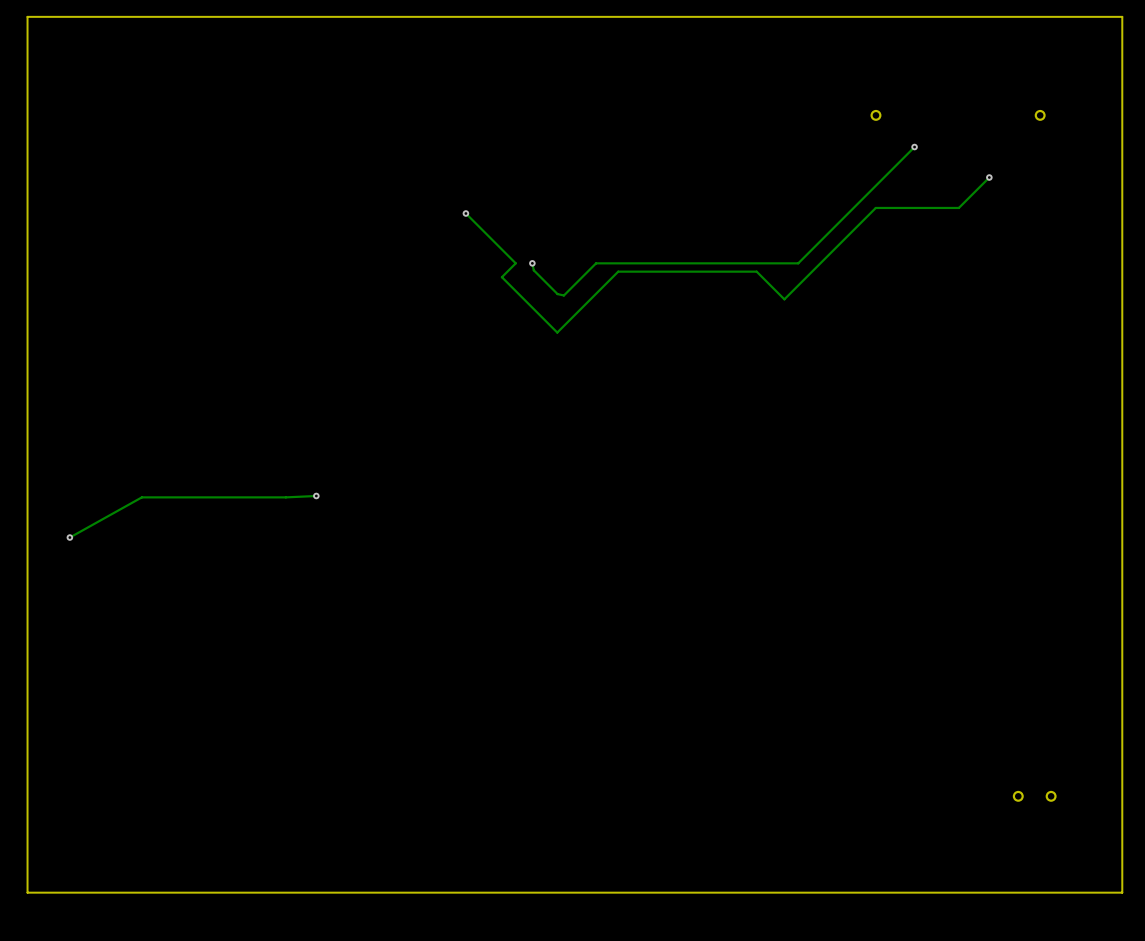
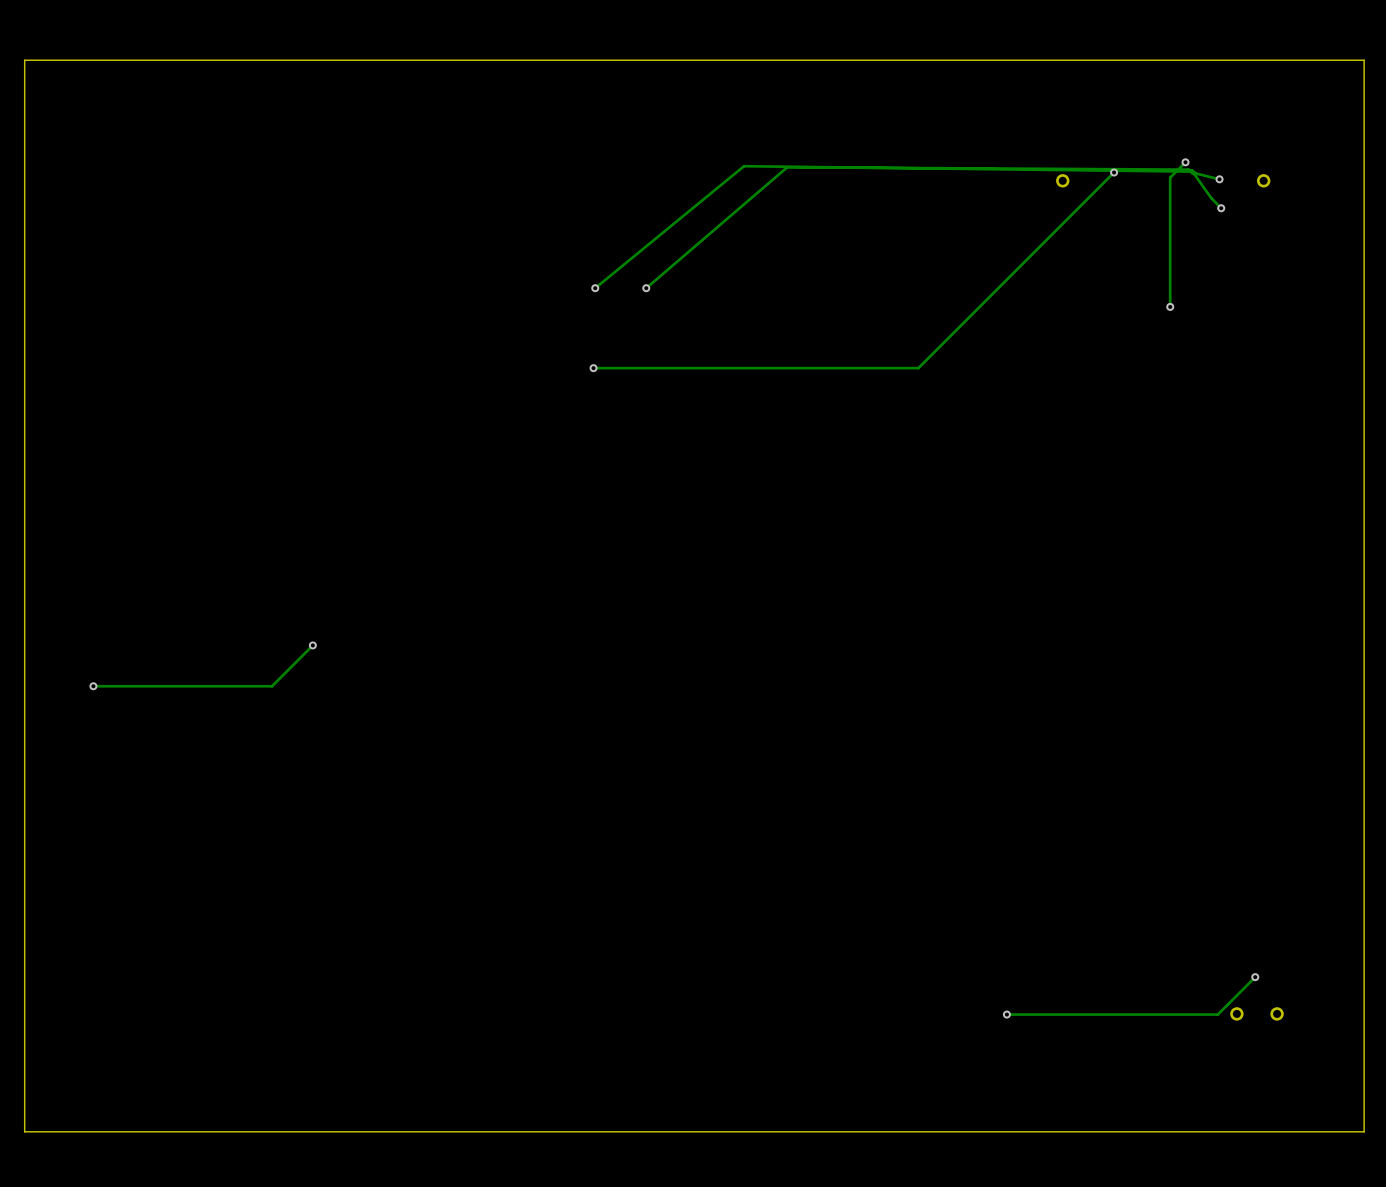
track: none -> (1185, 162) (1170, 177) (1170, 306)
via: none -> (1185, 162)
track: none -> (1114, 172) (918, 368) (593, 368)
via: none -> (1114, 172)
track: none -> (1219, 179) (1188, 169) (787, 167) (646, 288)
via: none -> (1219, 179)
track: none -> (1221, 208) (1211, 198) (1194, 174) (1190, 171) (744, 166) (595, 288)
via: none -> (1221, 208)
track: (914, 147) (798, 263) (596, 263) (563, 295) (557, 294) (533, 270) (532, 263) -> none
via: (914, 147) -> none
track: (989, 177) (958, 207) (875, 207) (784, 299) (756, 271) (618, 271) (557, 332) (501, 277) (515, 263) (465, 213) -> none
via: (989, 177) -> none
via: none -> (595, 288)
via: none -> (646, 288)
via: (465, 213) -> none
via: none -> (1170, 306)
via: (532, 263) -> none
via: none -> (593, 368)
track: none -> (312, 645) (272, 686) (93, 686)
via: none -> (312, 645)
track: (316, 495) (141, 497) (69, 537) -> none
via: (316, 495) -> none
via: none -> (93, 686)
via: (69, 537) -> none
track: none -> (1255, 977) (1217, 1014) (1006, 1014)
via: none -> (1255, 977)
via: none -> (1006, 1014)

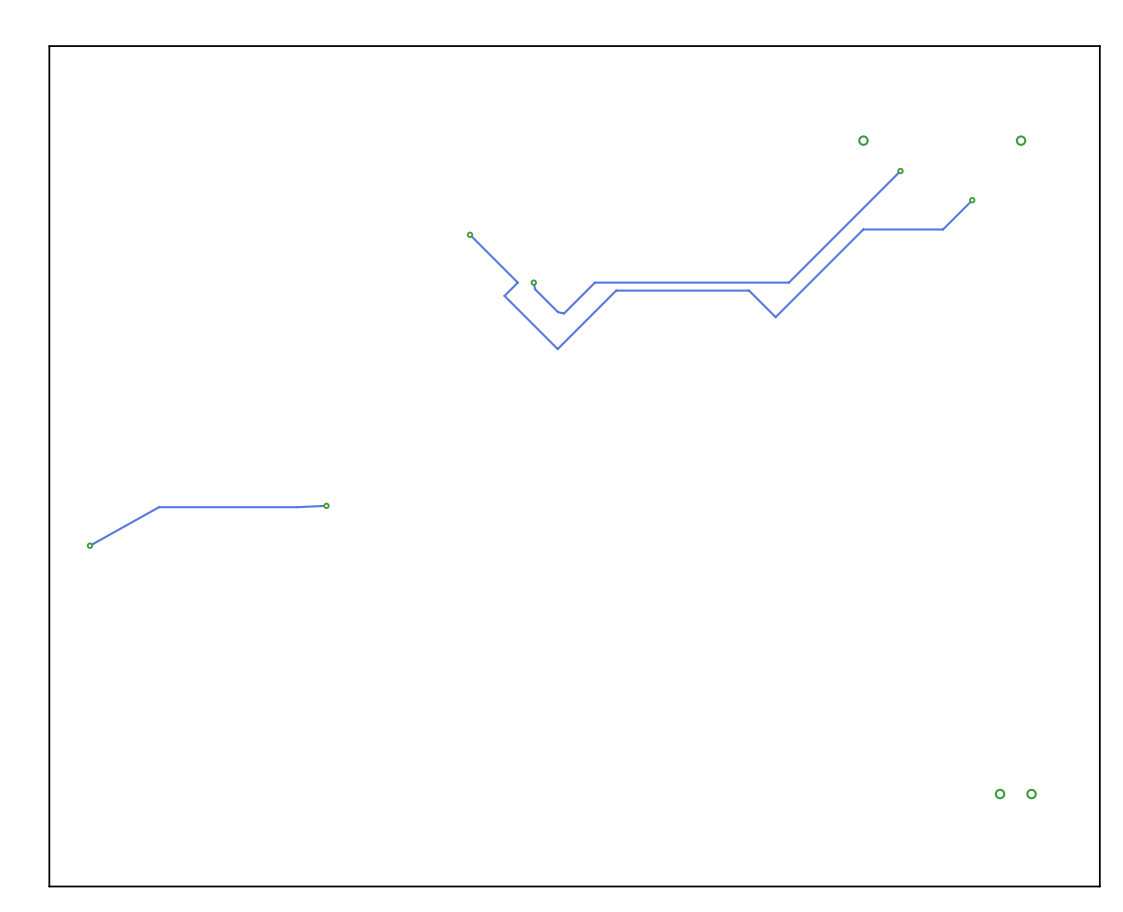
track: (1185, 162) (1170, 177) (1170, 306) -> none
via: (1185, 162) -> none
track: (1114, 172) (918, 368) (593, 368) -> none
via: (1114, 172) -> none
track: (1219, 179) (1188, 169) (787, 167) (646, 288) -> none
via: (1219, 179) -> none
track: (1221, 208) (1211, 198) (1194, 174) (1190, 171) (744, 166) (595, 288) -> none
via: (1221, 208) -> none
track: none -> (900, 171) (788, 282) (594, 282) (564, 313) (557, 312) (535, 289) (533, 282)
via: none -> (900, 171)
track: none -> (972, 200) (943, 229) (863, 229) (775, 317) (749, 290) (616, 290) (557, 349) (504, 295) (517, 282) (469, 234)
via: none -> (972, 200)
via: (595, 288) -> none
via: (646, 288) -> none
via: none -> (469, 234)
via: (1170, 306) -> none
via: none -> (533, 282)
via: (593, 368) -> none
track: (312, 645) (272, 686) (93, 686) -> none
via: (312, 645) -> none
track: none -> (326, 505) (159, 507) (89, 545)
via: none -> (326, 505)
via: (93, 686) -> none
via: none -> (89, 545)
track: (1255, 977) (1217, 1014) (1006, 1014) -> none
via: (1255, 977) -> none
via: (1006, 1014) -> none

